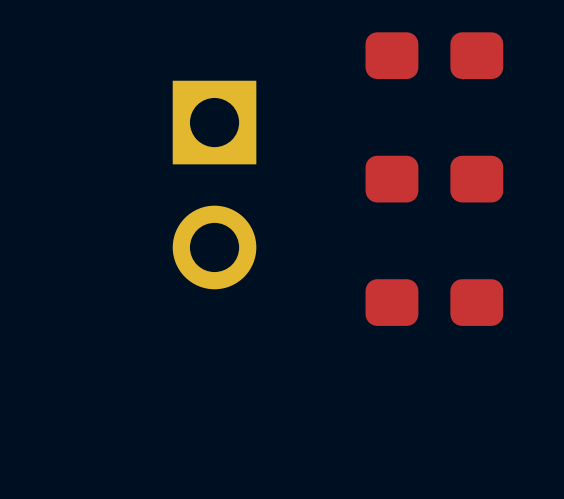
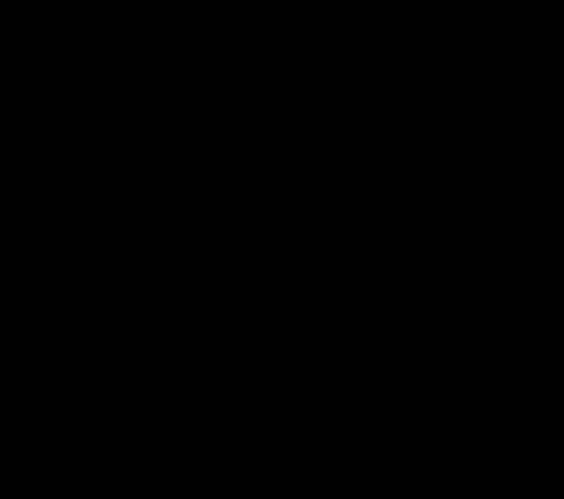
part: (434, 55) -> none
part: (434, 179) -> none
part: (214, 185) -> none
part: (434, 302) -> none

